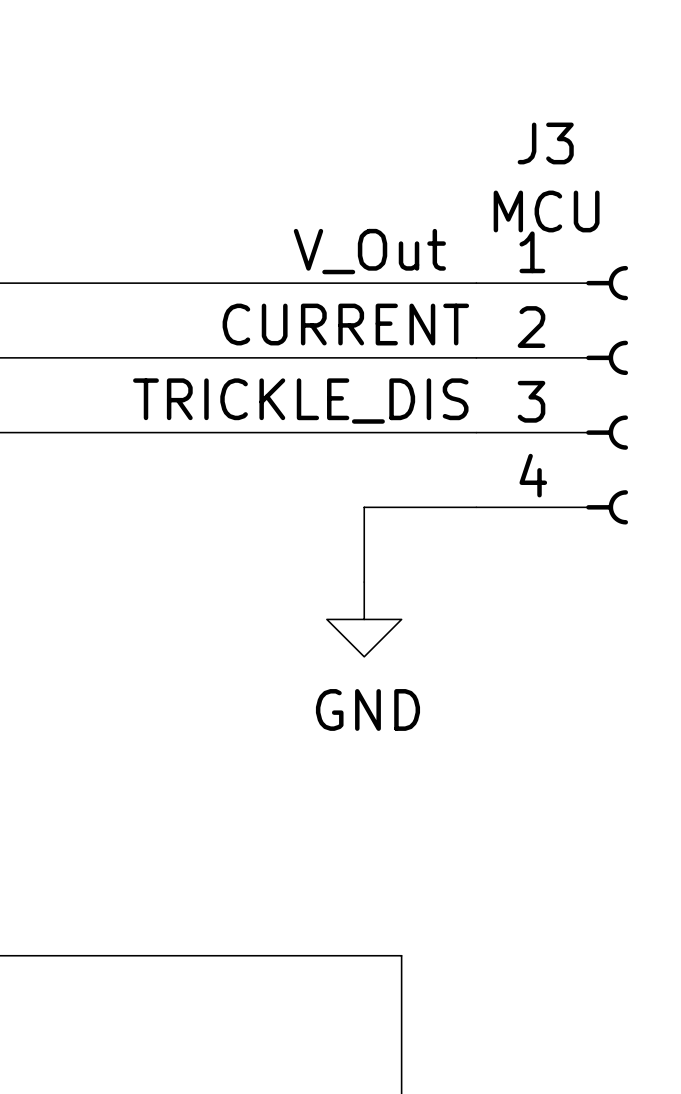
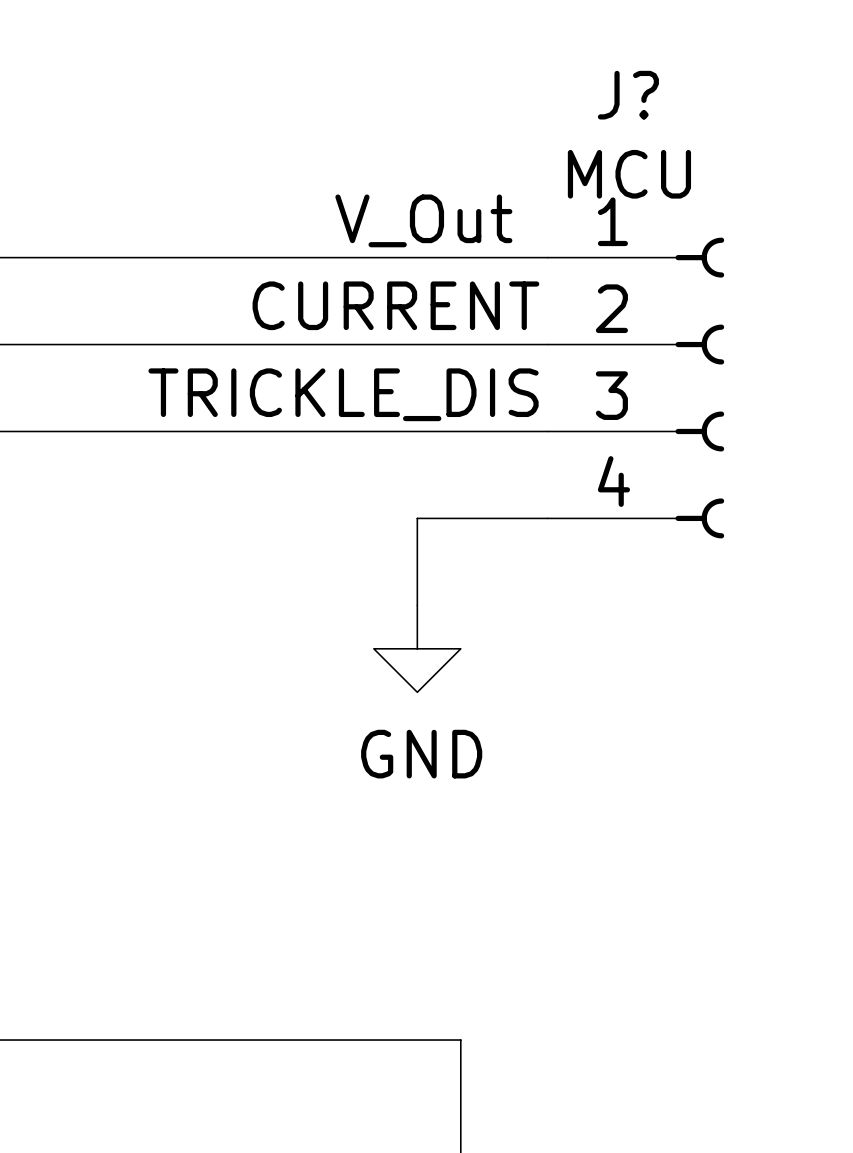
J3 name: J3 (545, 143) -> J? (628, 95)

